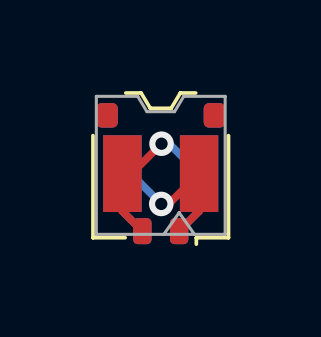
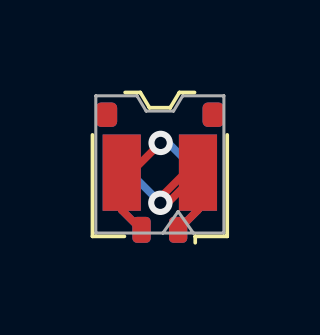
top track: none -> (185, 172) (159, 198)

